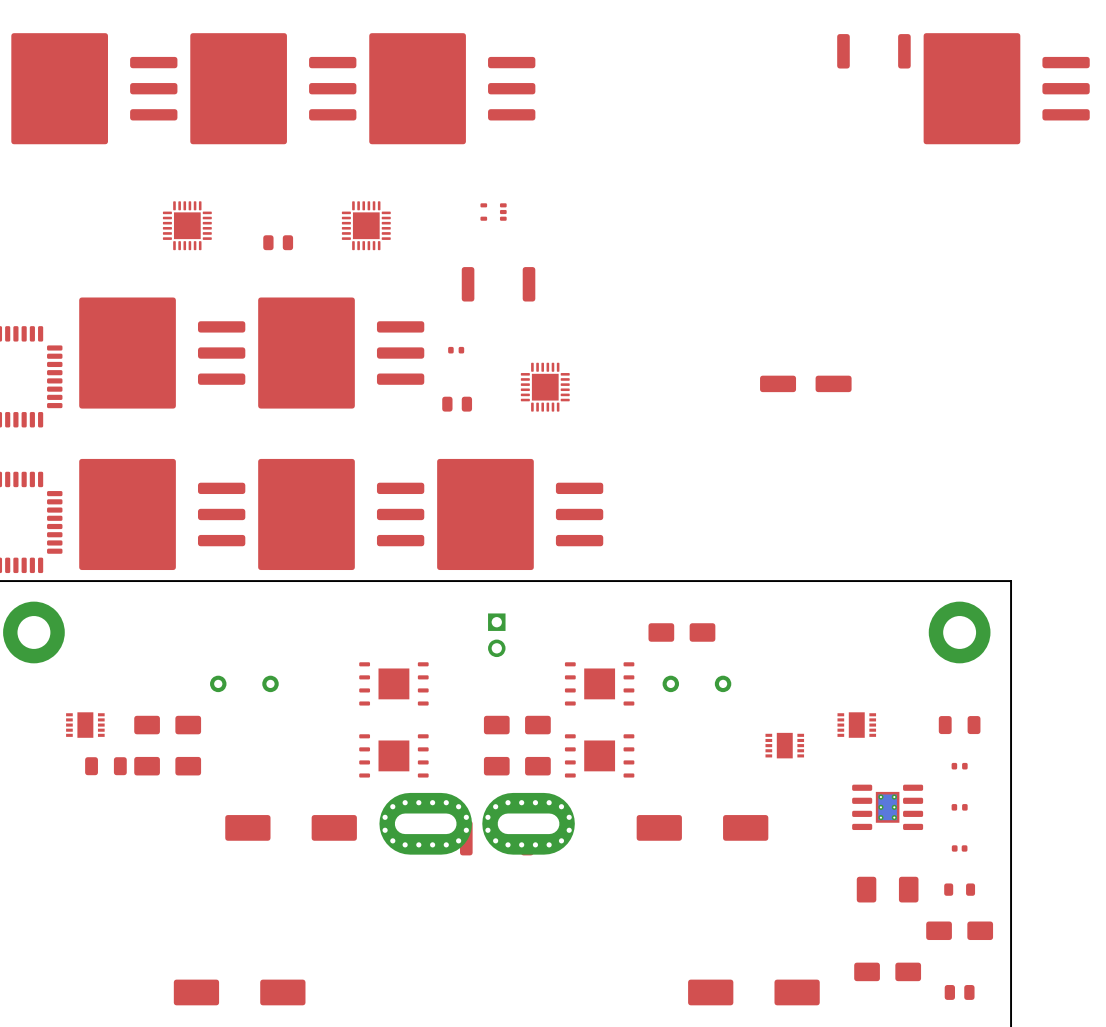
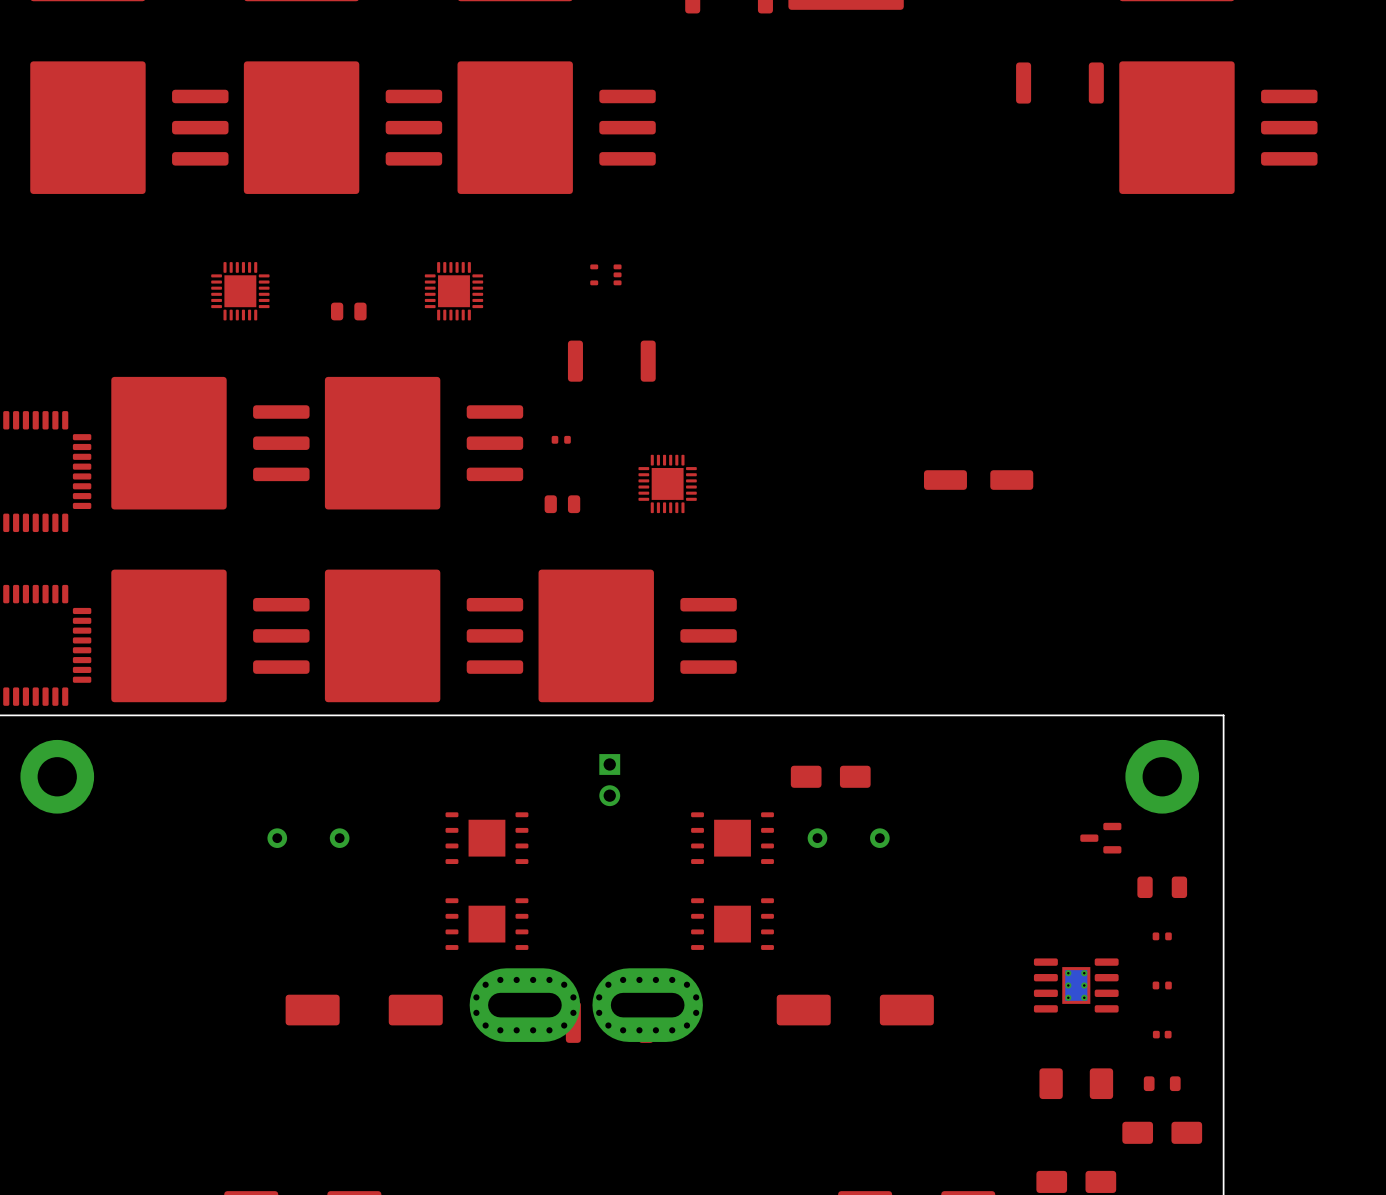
part: none -> (1100, 838)
part: (85, 725) -> none
part: (167, 725) -> none
part: (517, 725) -> none
part: (856, 725) -> none
part: (784, 745) -> none
part: (105, 766) -> none
part: (167, 766) -> none
part: (517, 766) -> none

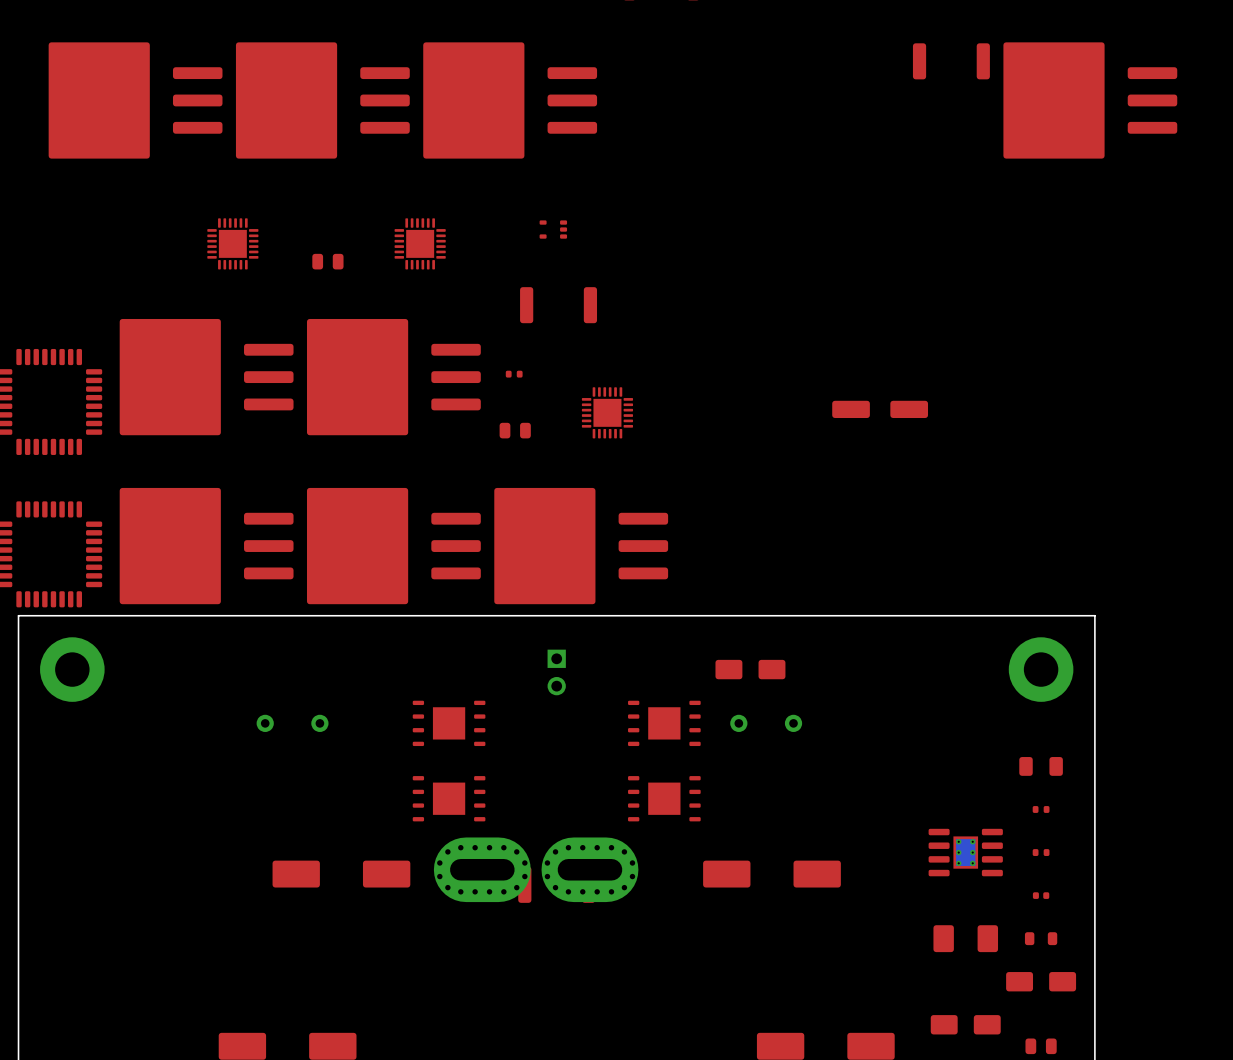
part: (1100, 838) -> none

